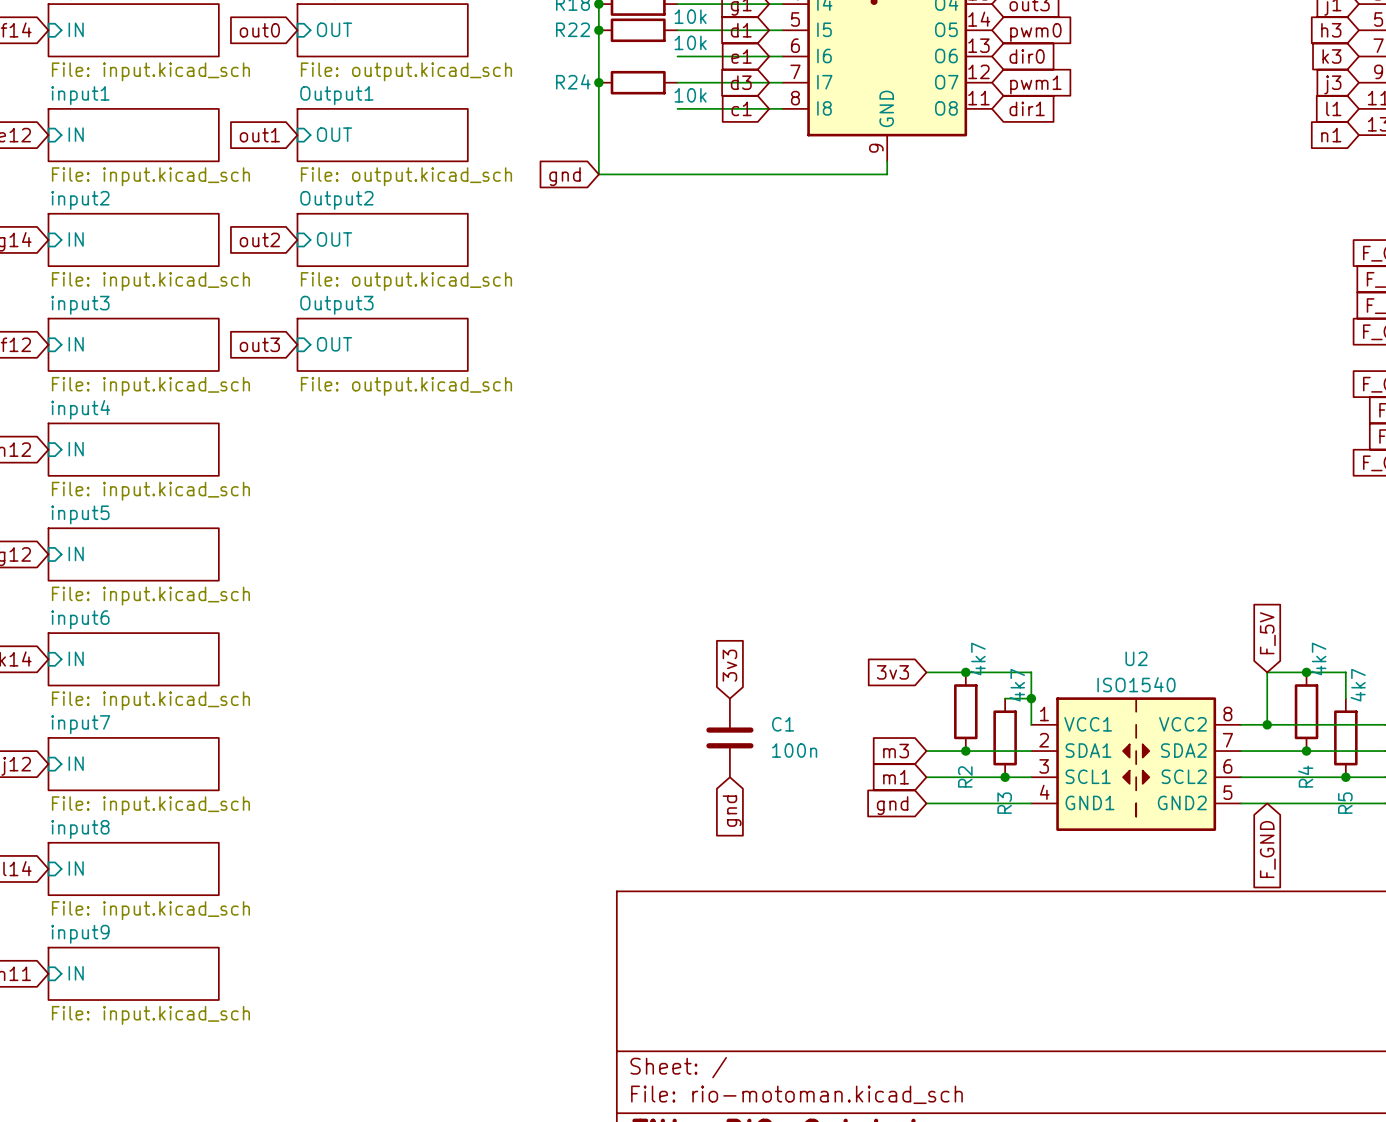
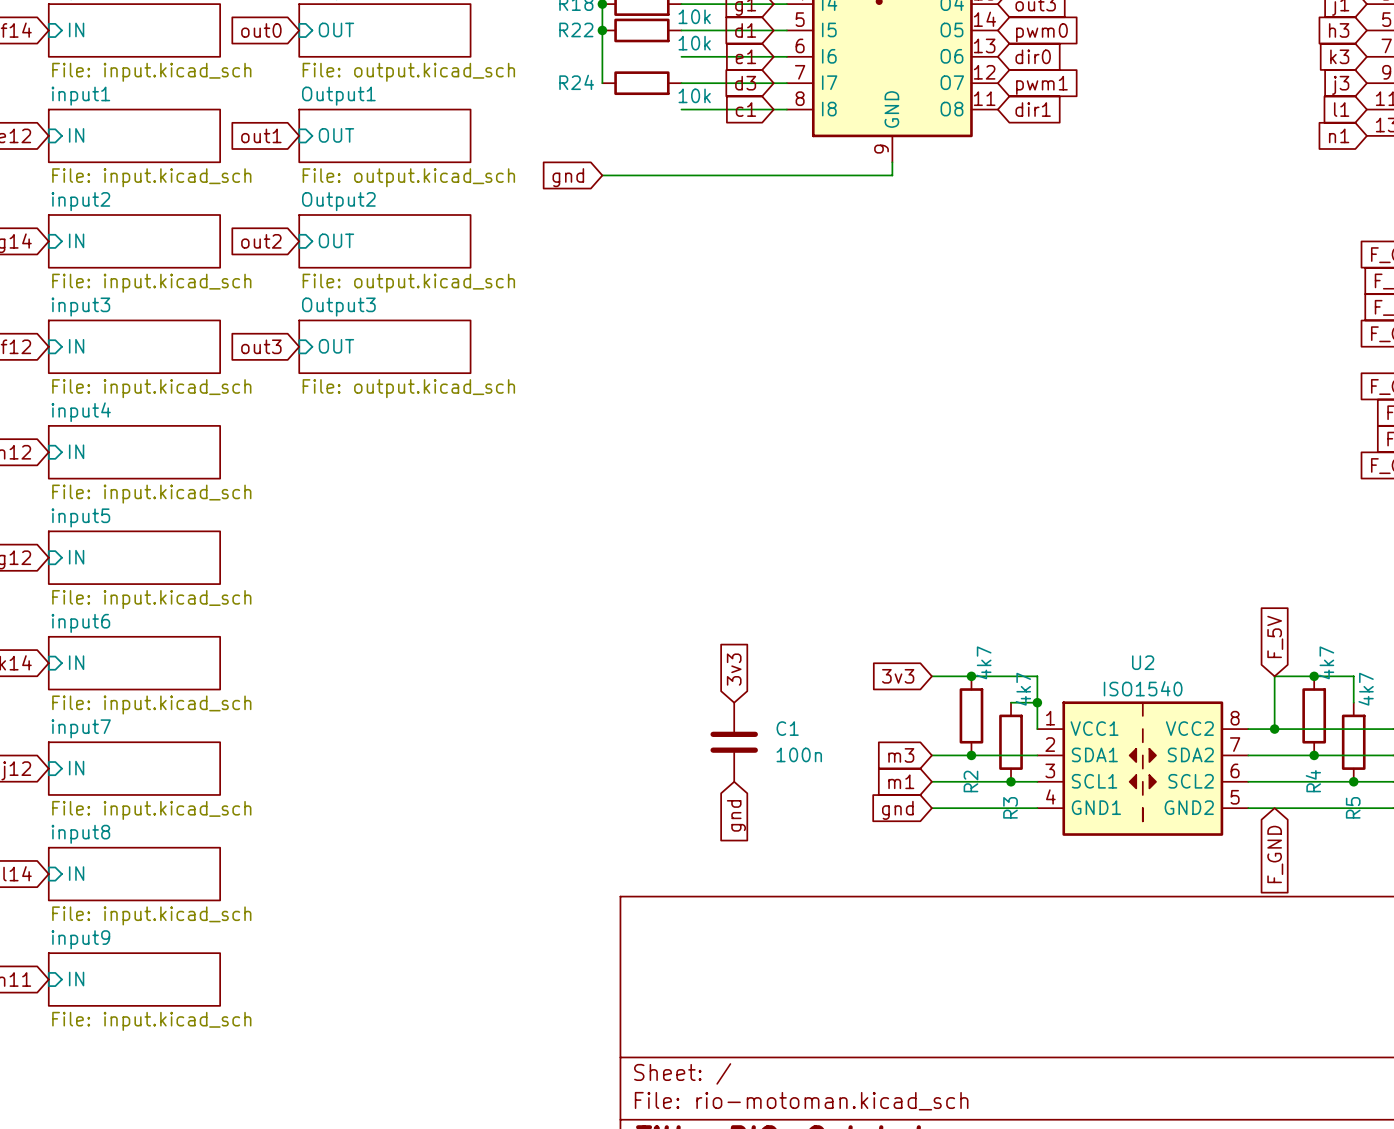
wire: (598, 82) (598, 174) -> none
junction: (598, 82) -> none

